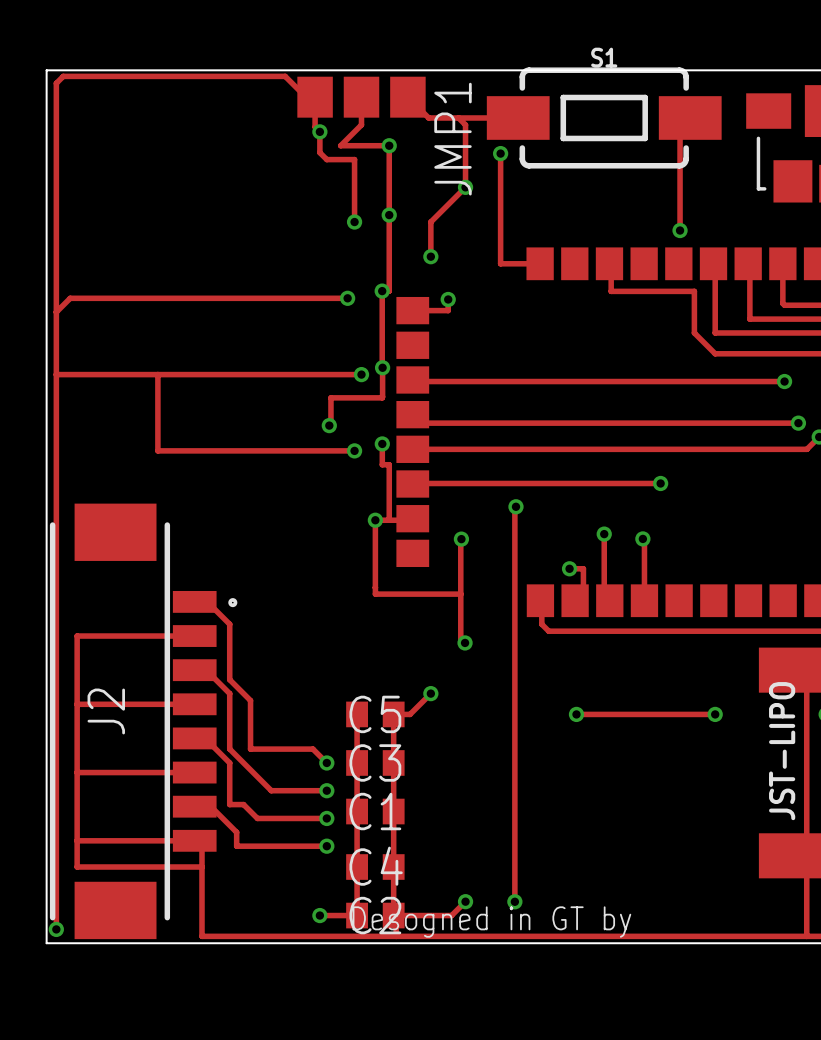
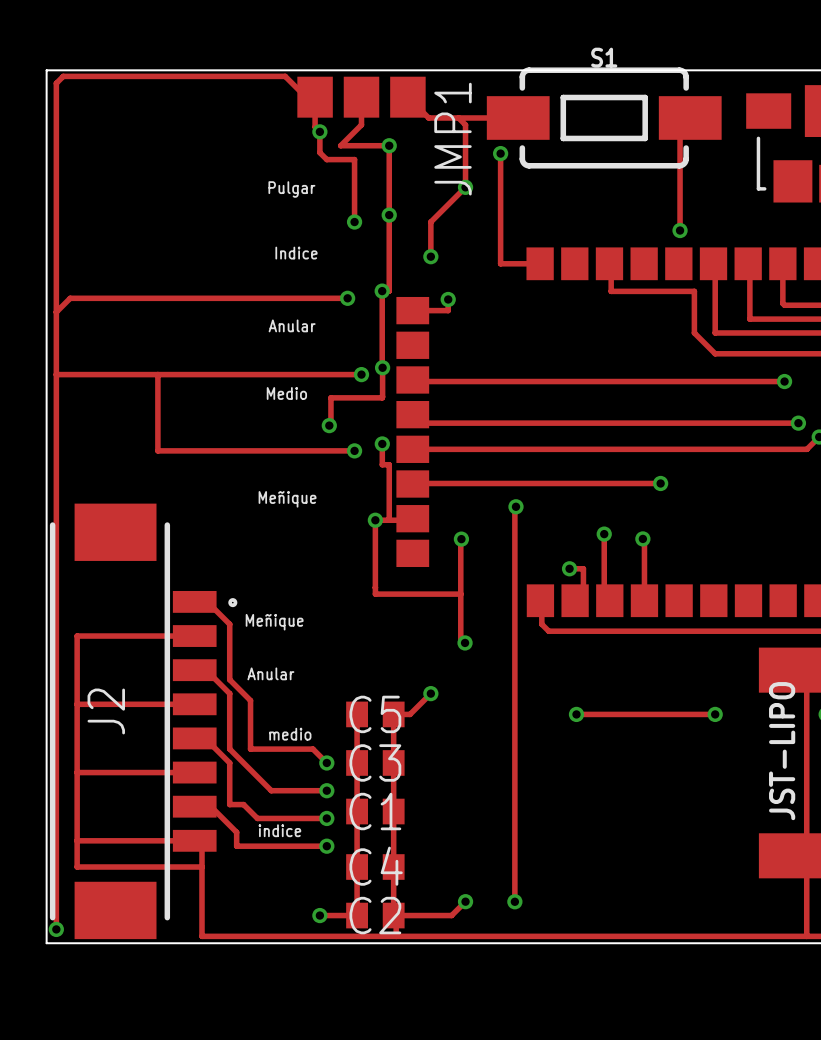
text: none -> Pulgar (291, 189)
text: none -> Indice (296, 253)
text: none -> Anular (292, 325)
text: none -> Medio (286, 393)
text: none -> Meñique (287, 499)
text: none -> Meñique (274, 622)
text: none -> Anular (270, 673)
text: none -> medio (290, 734)
text: none -> indice (279, 830)
text: Desogned in GT by (491, 922) -> none

